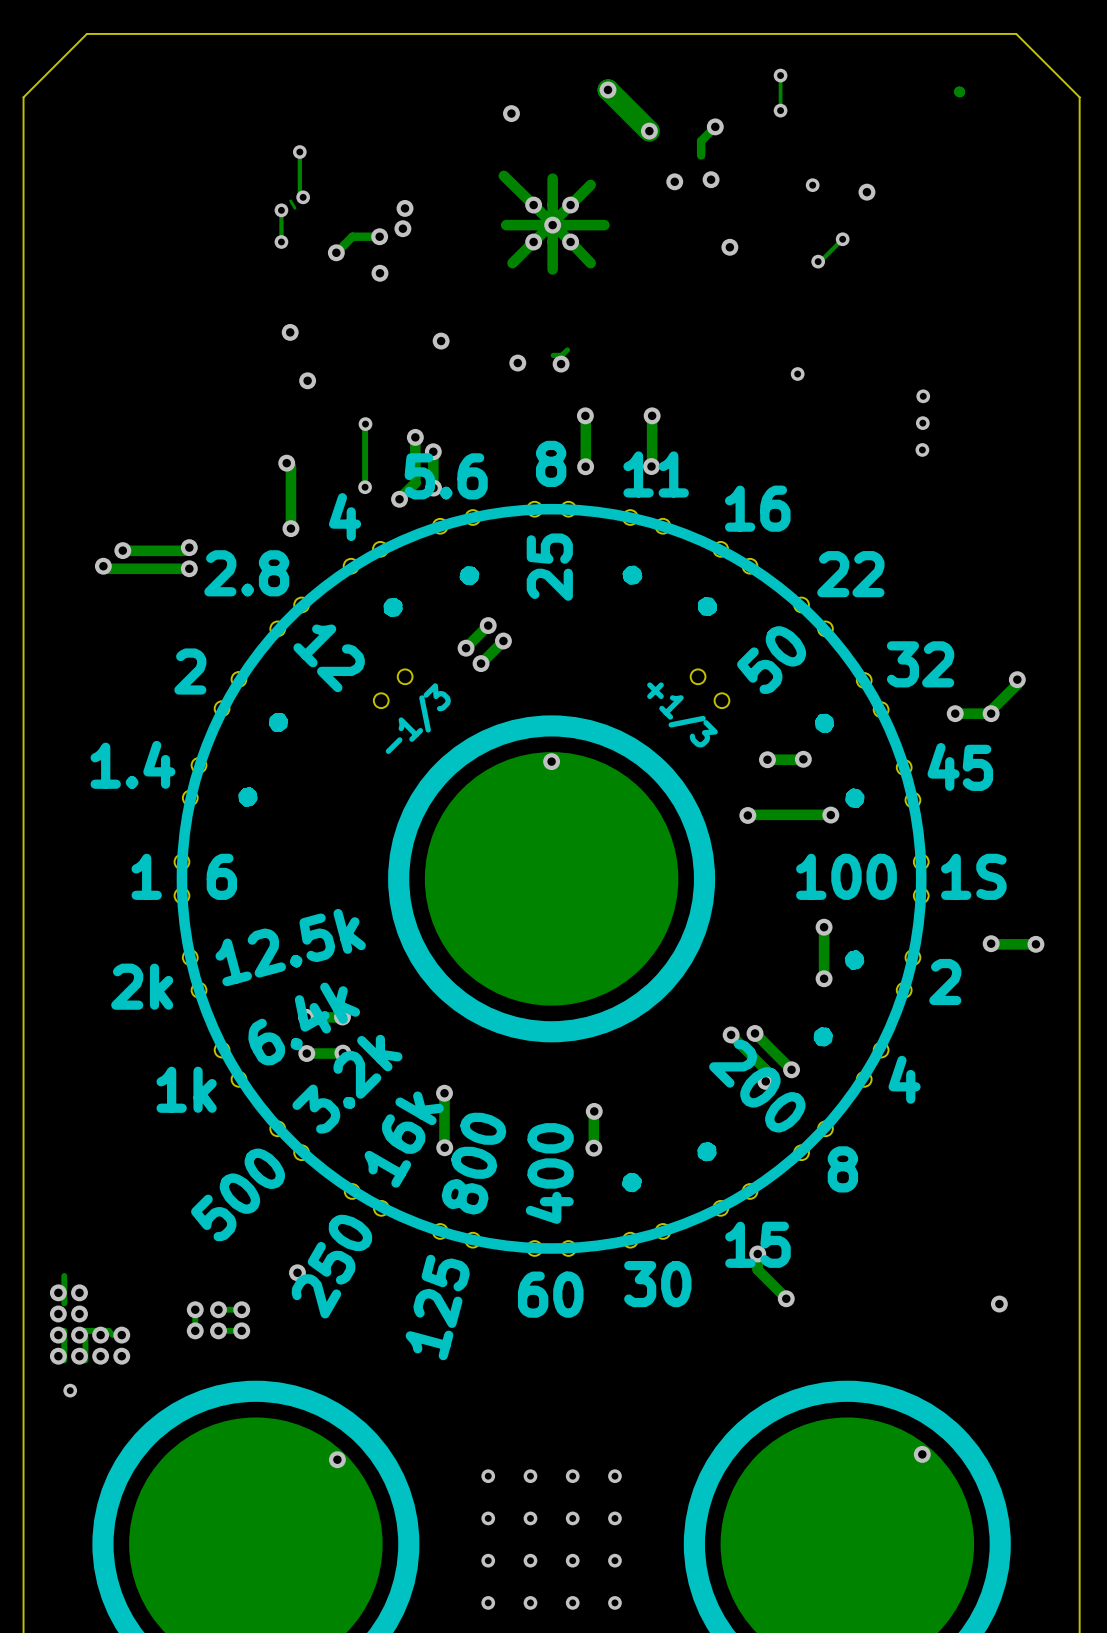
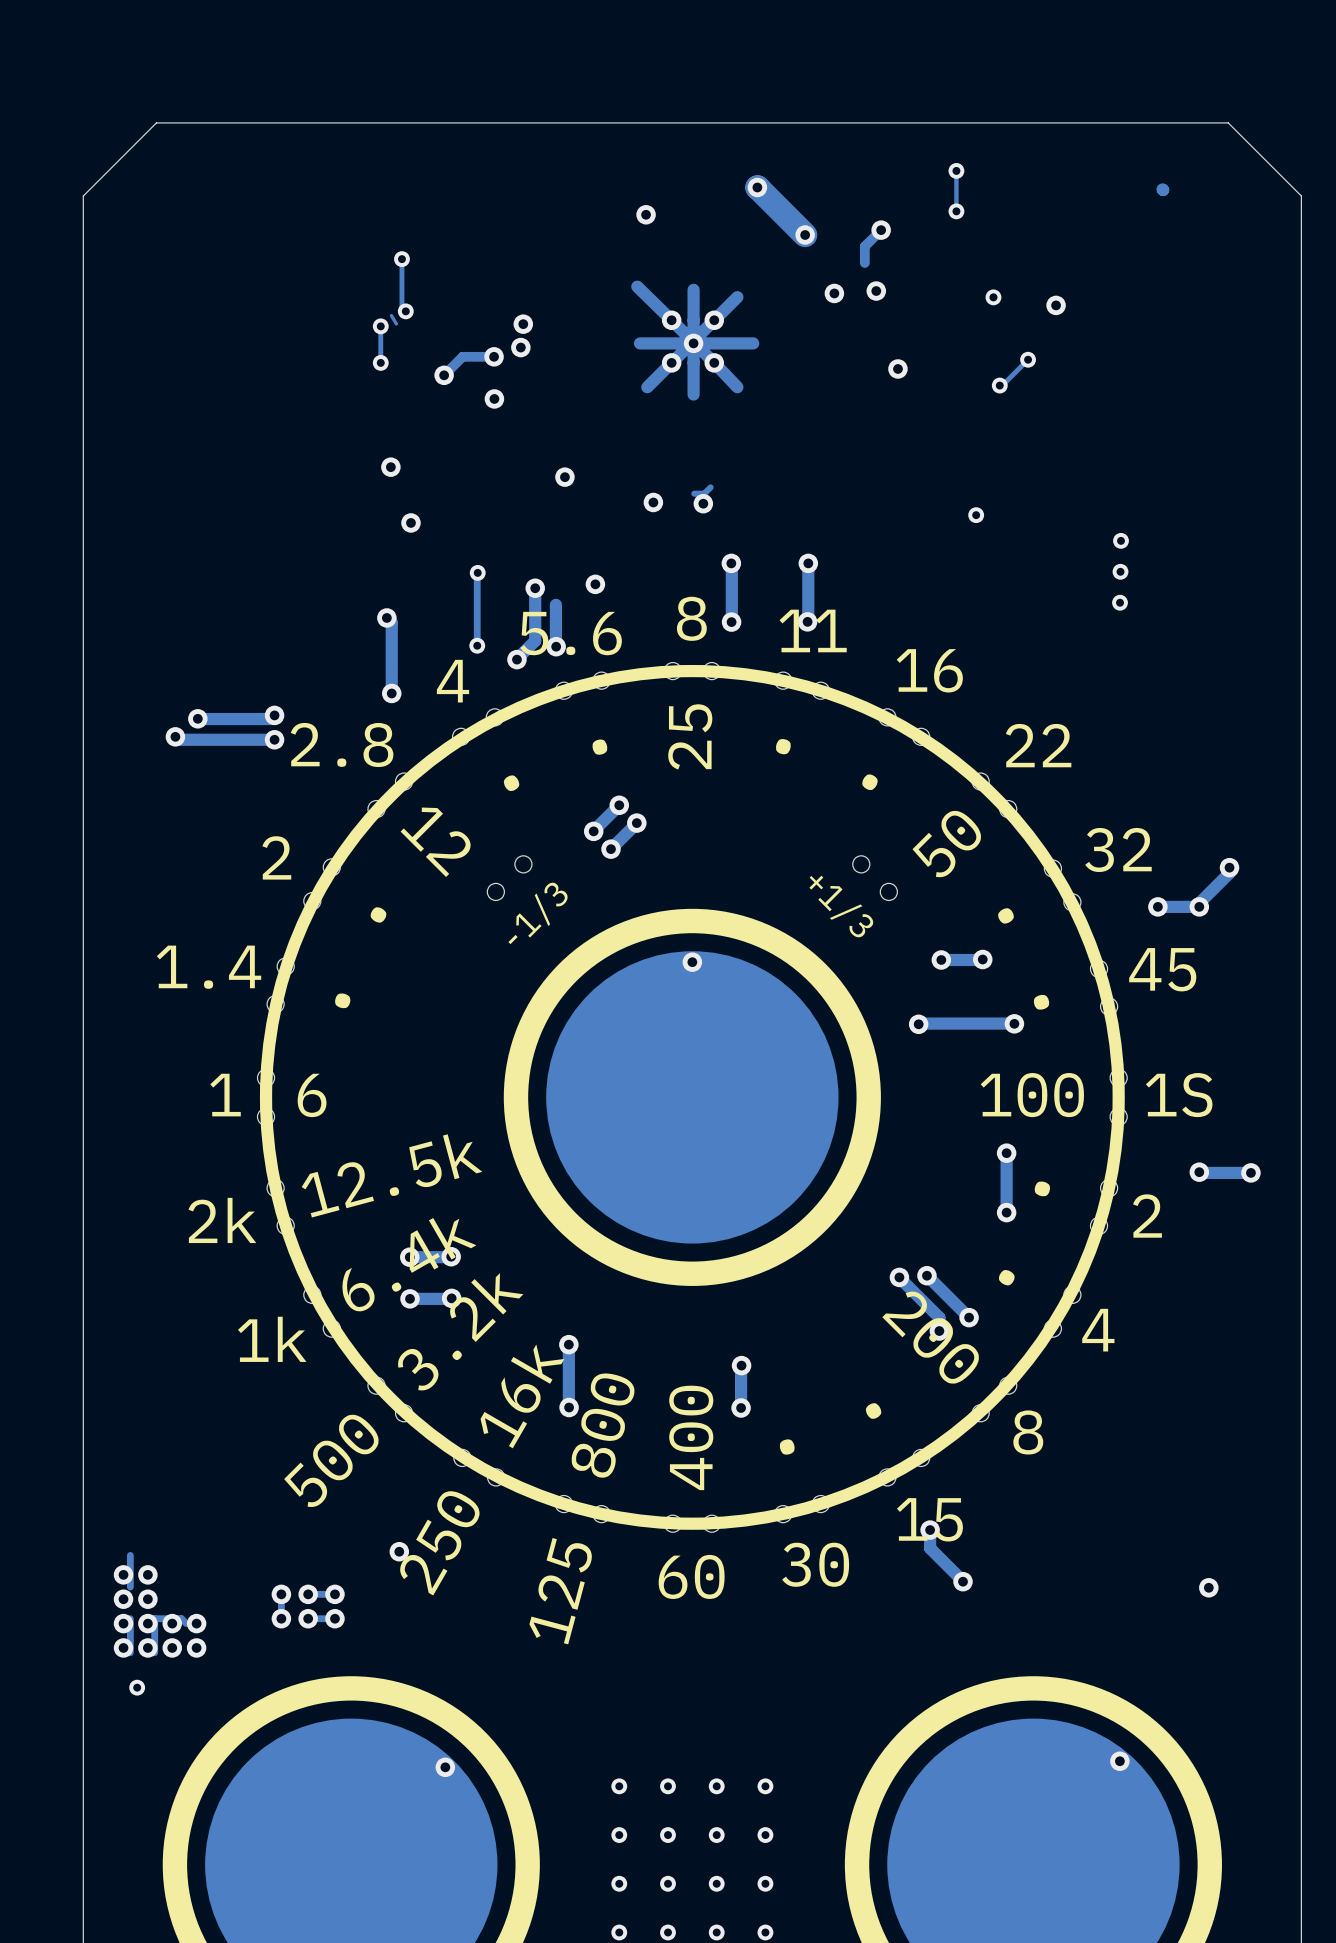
via position: (433, 451) -> (595, 584)

